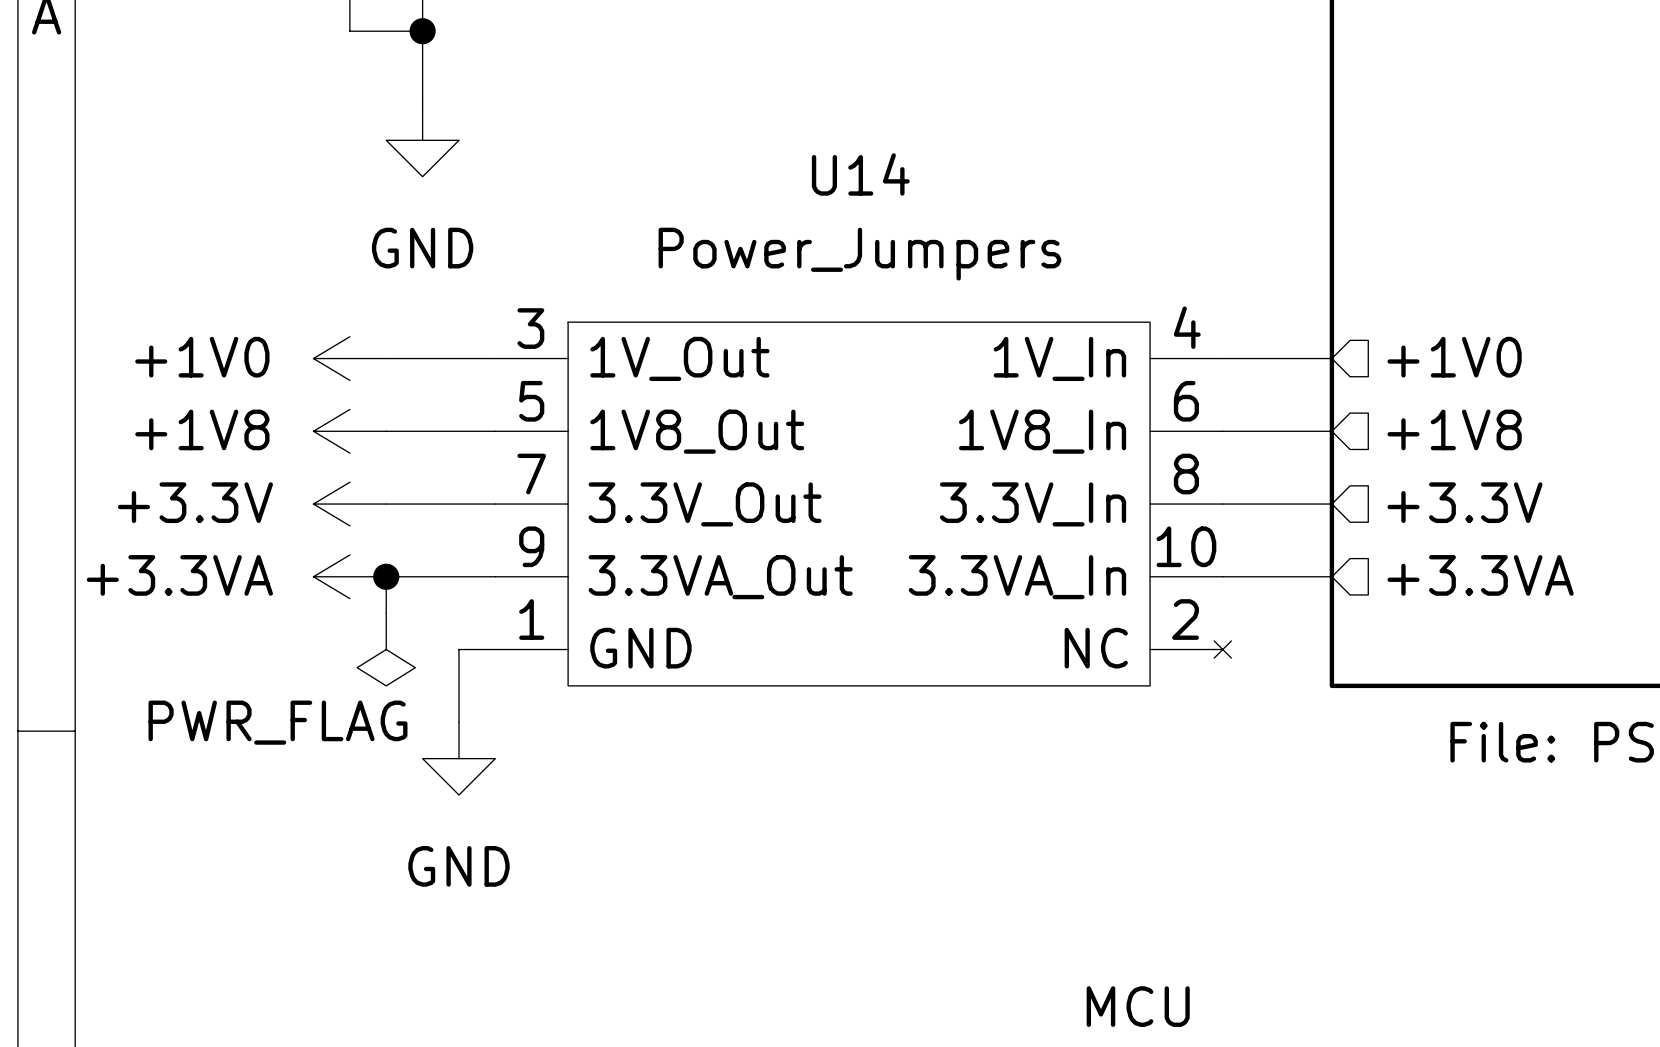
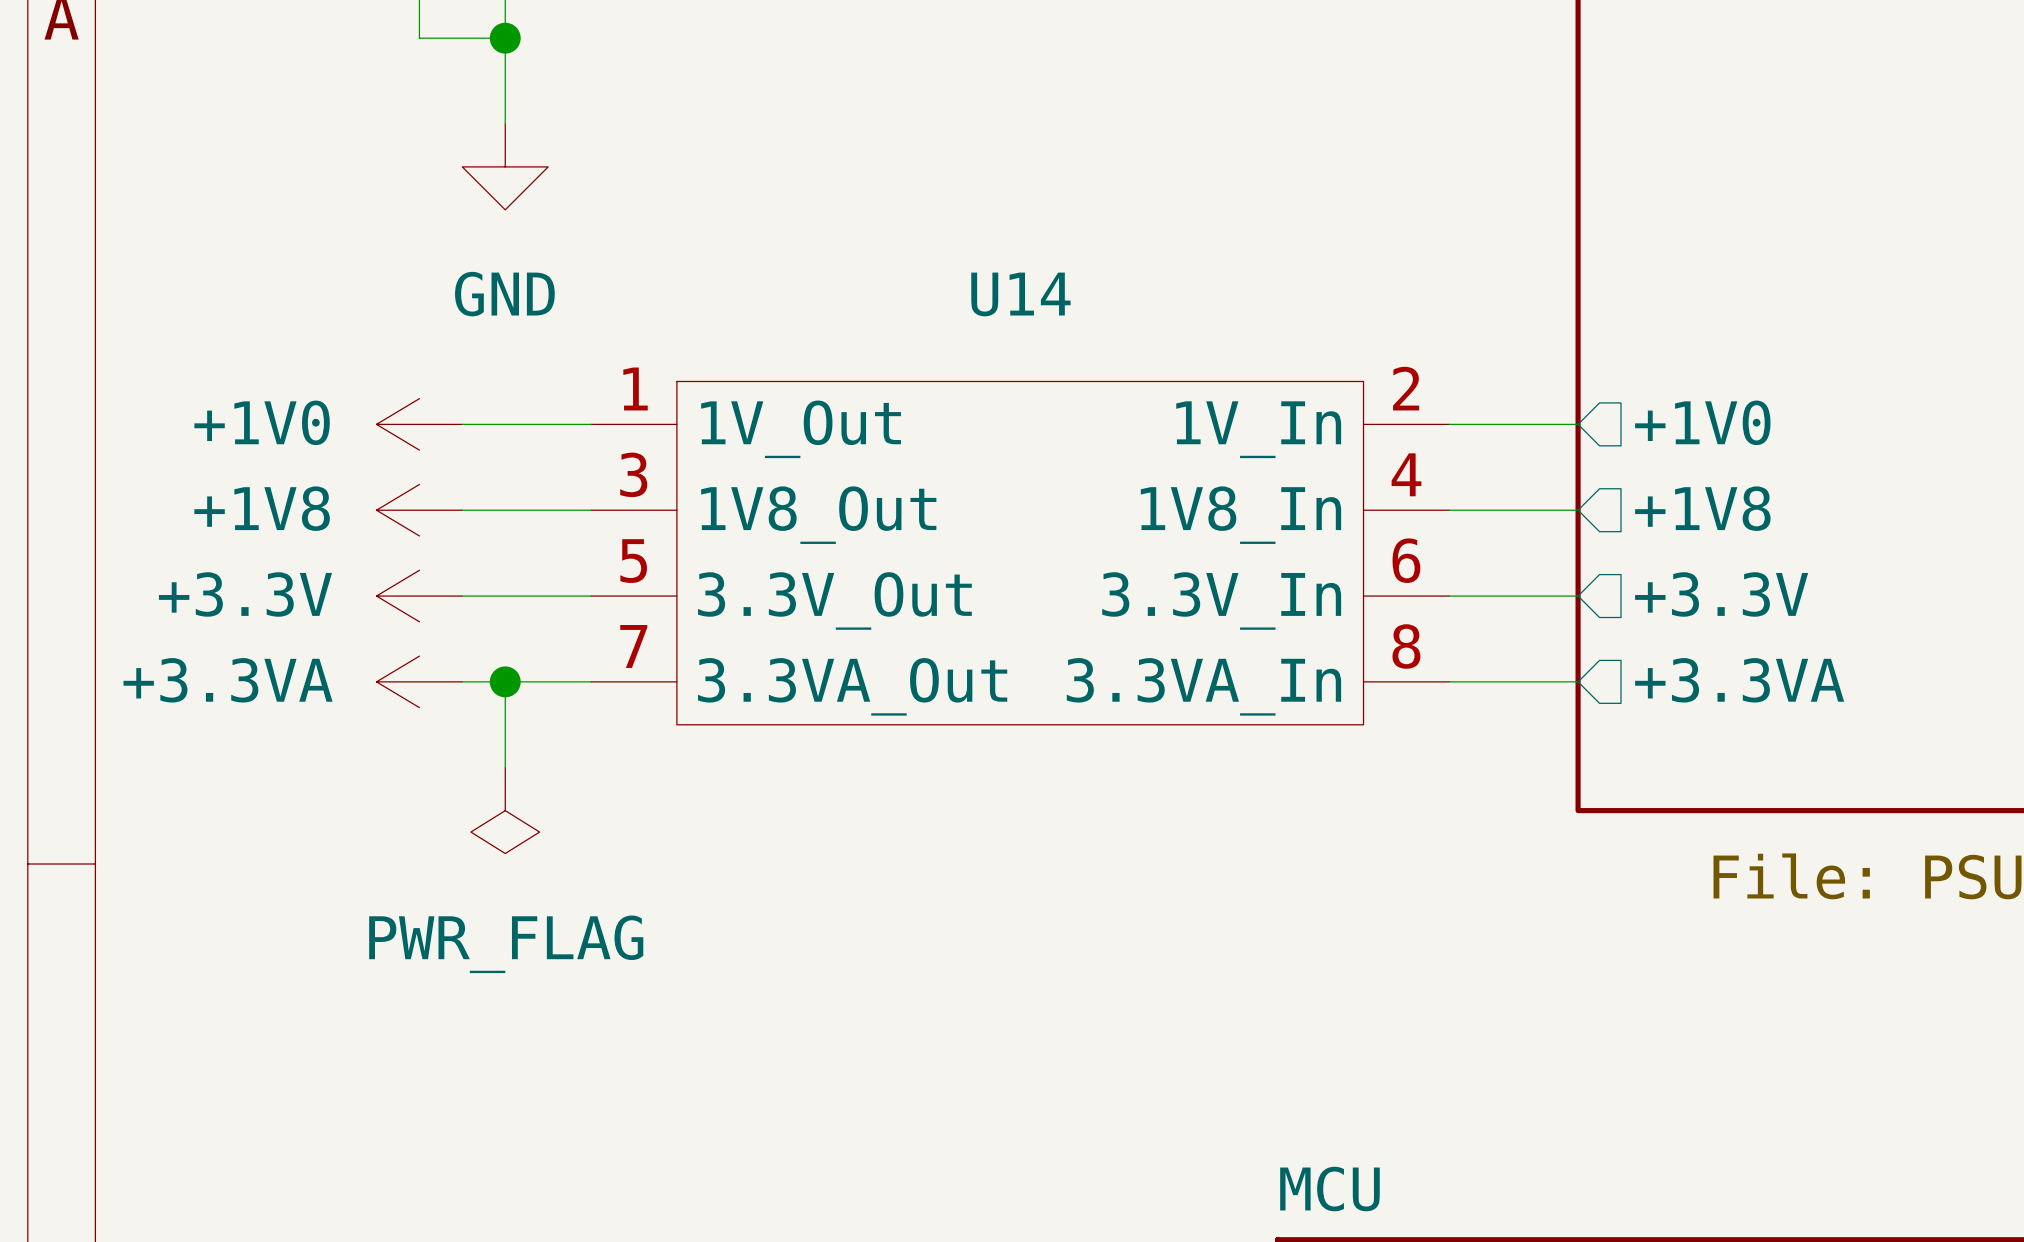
U14 name position: U14 (860, 174) -> U14 (1020, 294)
U14 value: Power_Jumpers (859, 254) -> none
U14 symbol: [495, 322, 1232, 686] -> [591, 381, 1450, 725]
wire: (386, 576) (386, 613) -> none
junction position: (386, 576) -> (505, 681)
wire: none -> (505, 681) (505, 767)
power symbol position: PWR_FLAG (386, 649) -> PWR_FLAG (505, 810)
wire: (495, 649) (458, 649) (458, 722) -> none
power symbol text position: PWR_FLAG (277, 722) -> PWR_FLAG (506, 944)
power symbol: GND (458, 758) -> none

